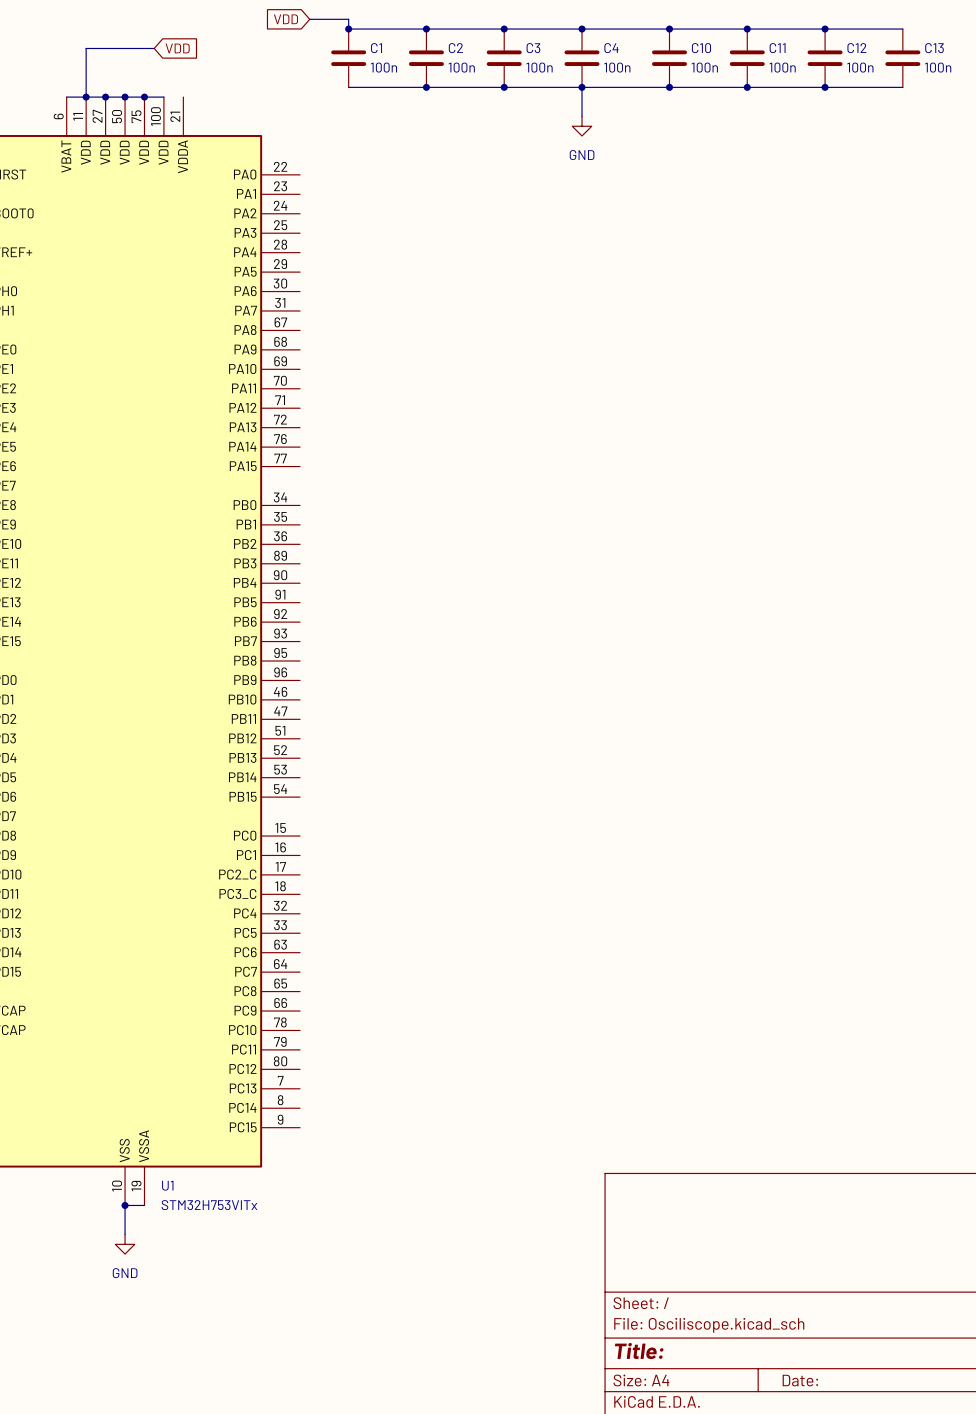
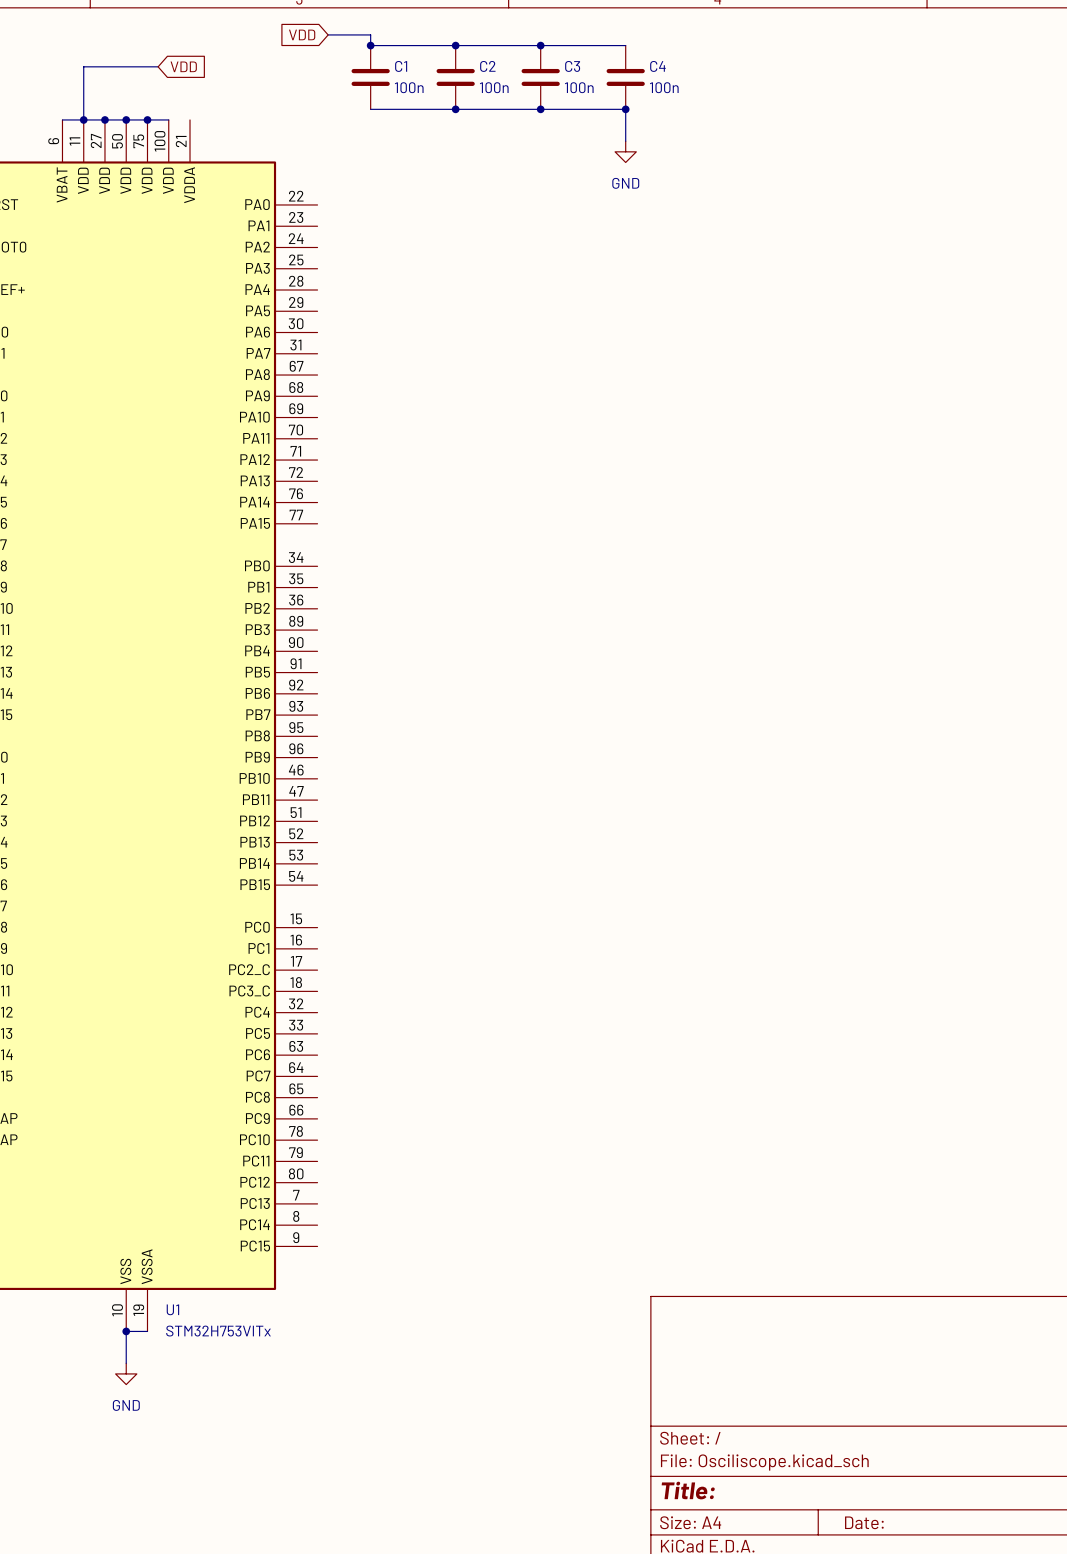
wire: (582, 29) (902, 29) -> none
junction: (582, 29) -> none
junction: (669, 29) -> none
junction: (747, 29) -> none
junction: (825, 29) -> none
C10: 100n (669, 58) -> none
C11: 100n (747, 58) -> none
C12: 100n (825, 58) -> none
C13: 100n (902, 58) -> none
wire: (582, 87) (902, 87) -> none
junction: (669, 87) -> none
junction: (747, 87) -> none
junction: (825, 87) -> none

